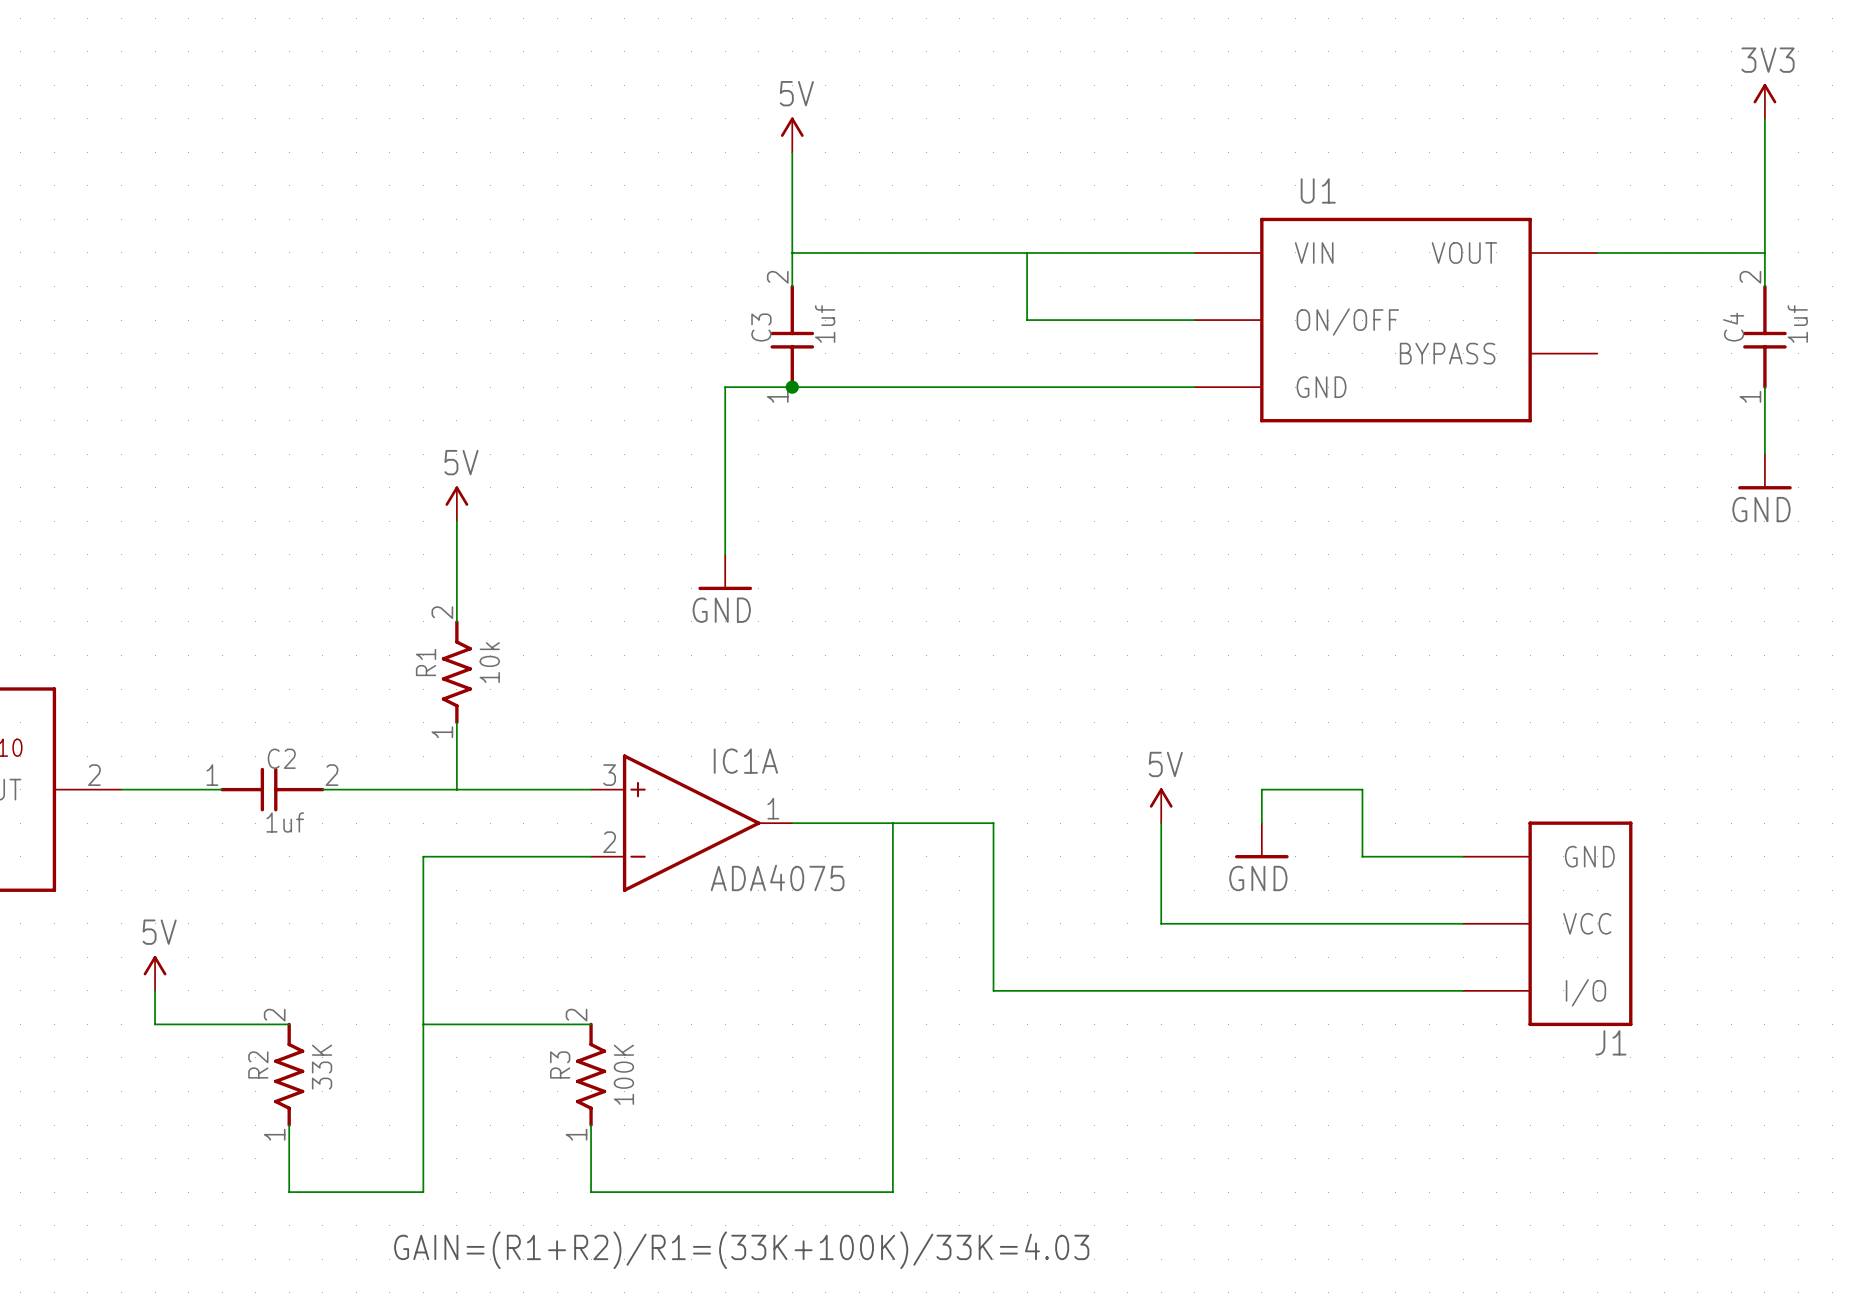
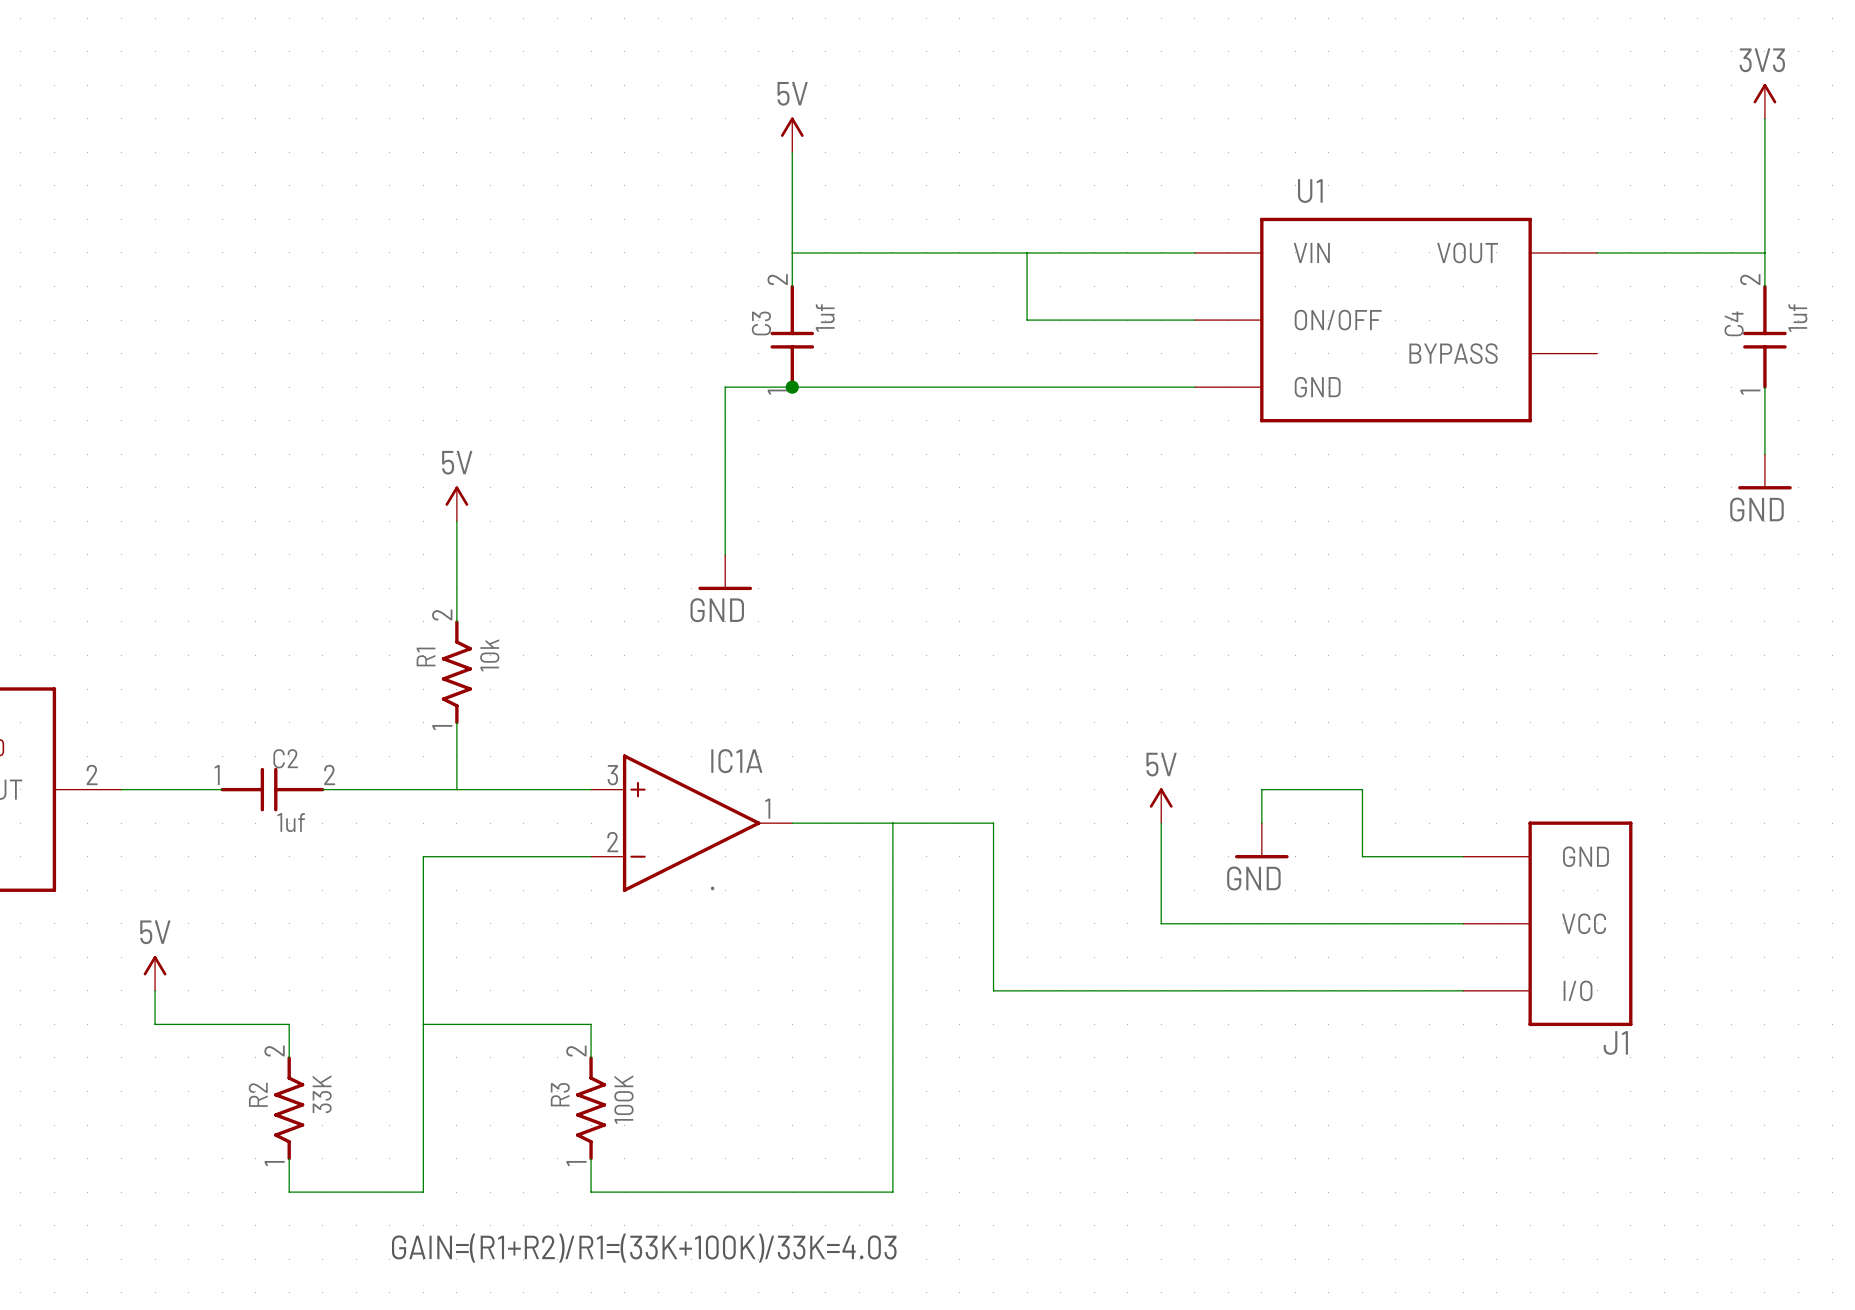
IC1A value: ADA4075 (777, 877) -> . (712, 888)
R2 position: (289, 1074) -> (289, 1108)
R3 position: (591, 1074) -> (591, 1108)

